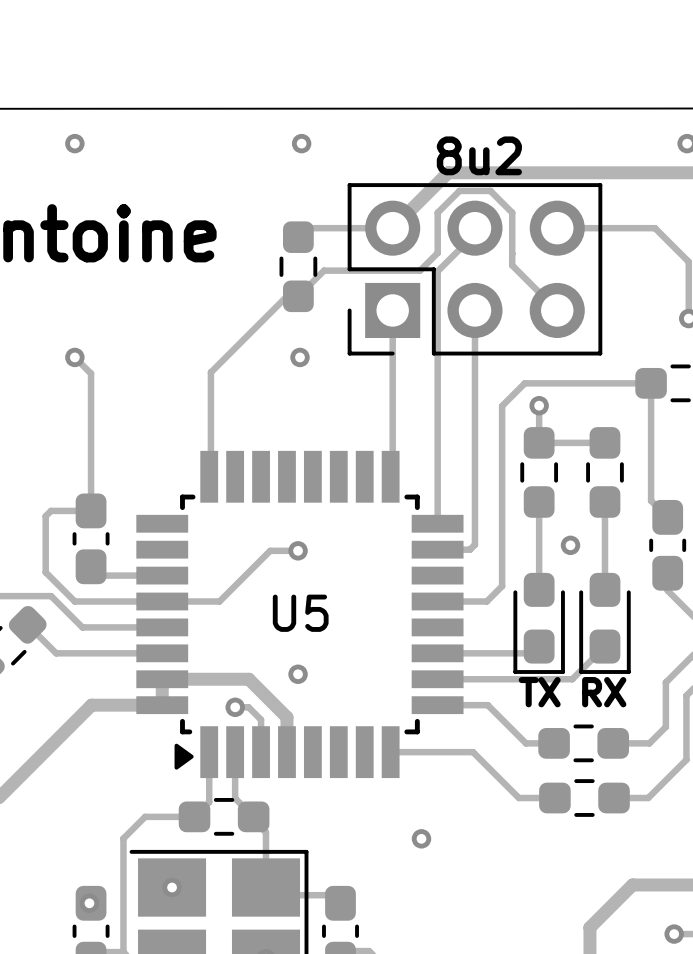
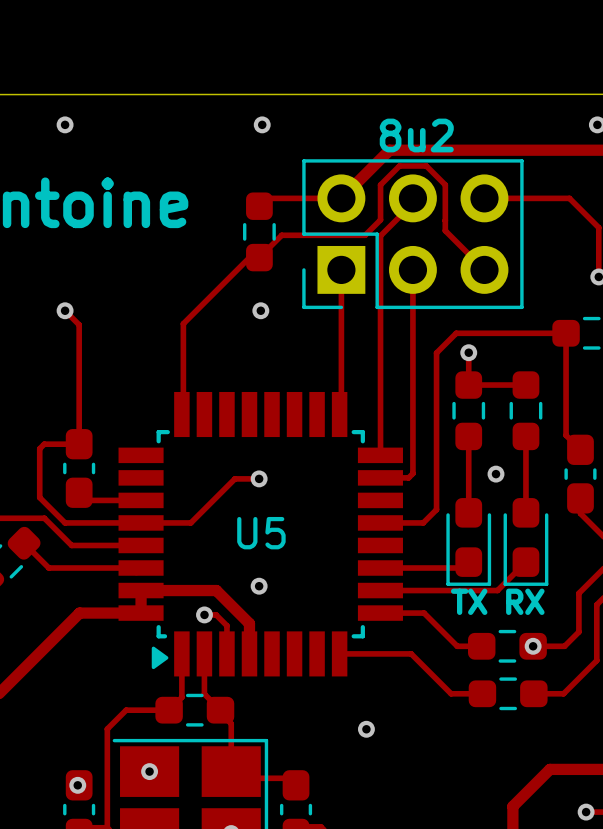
via: none -> (533, 646)

